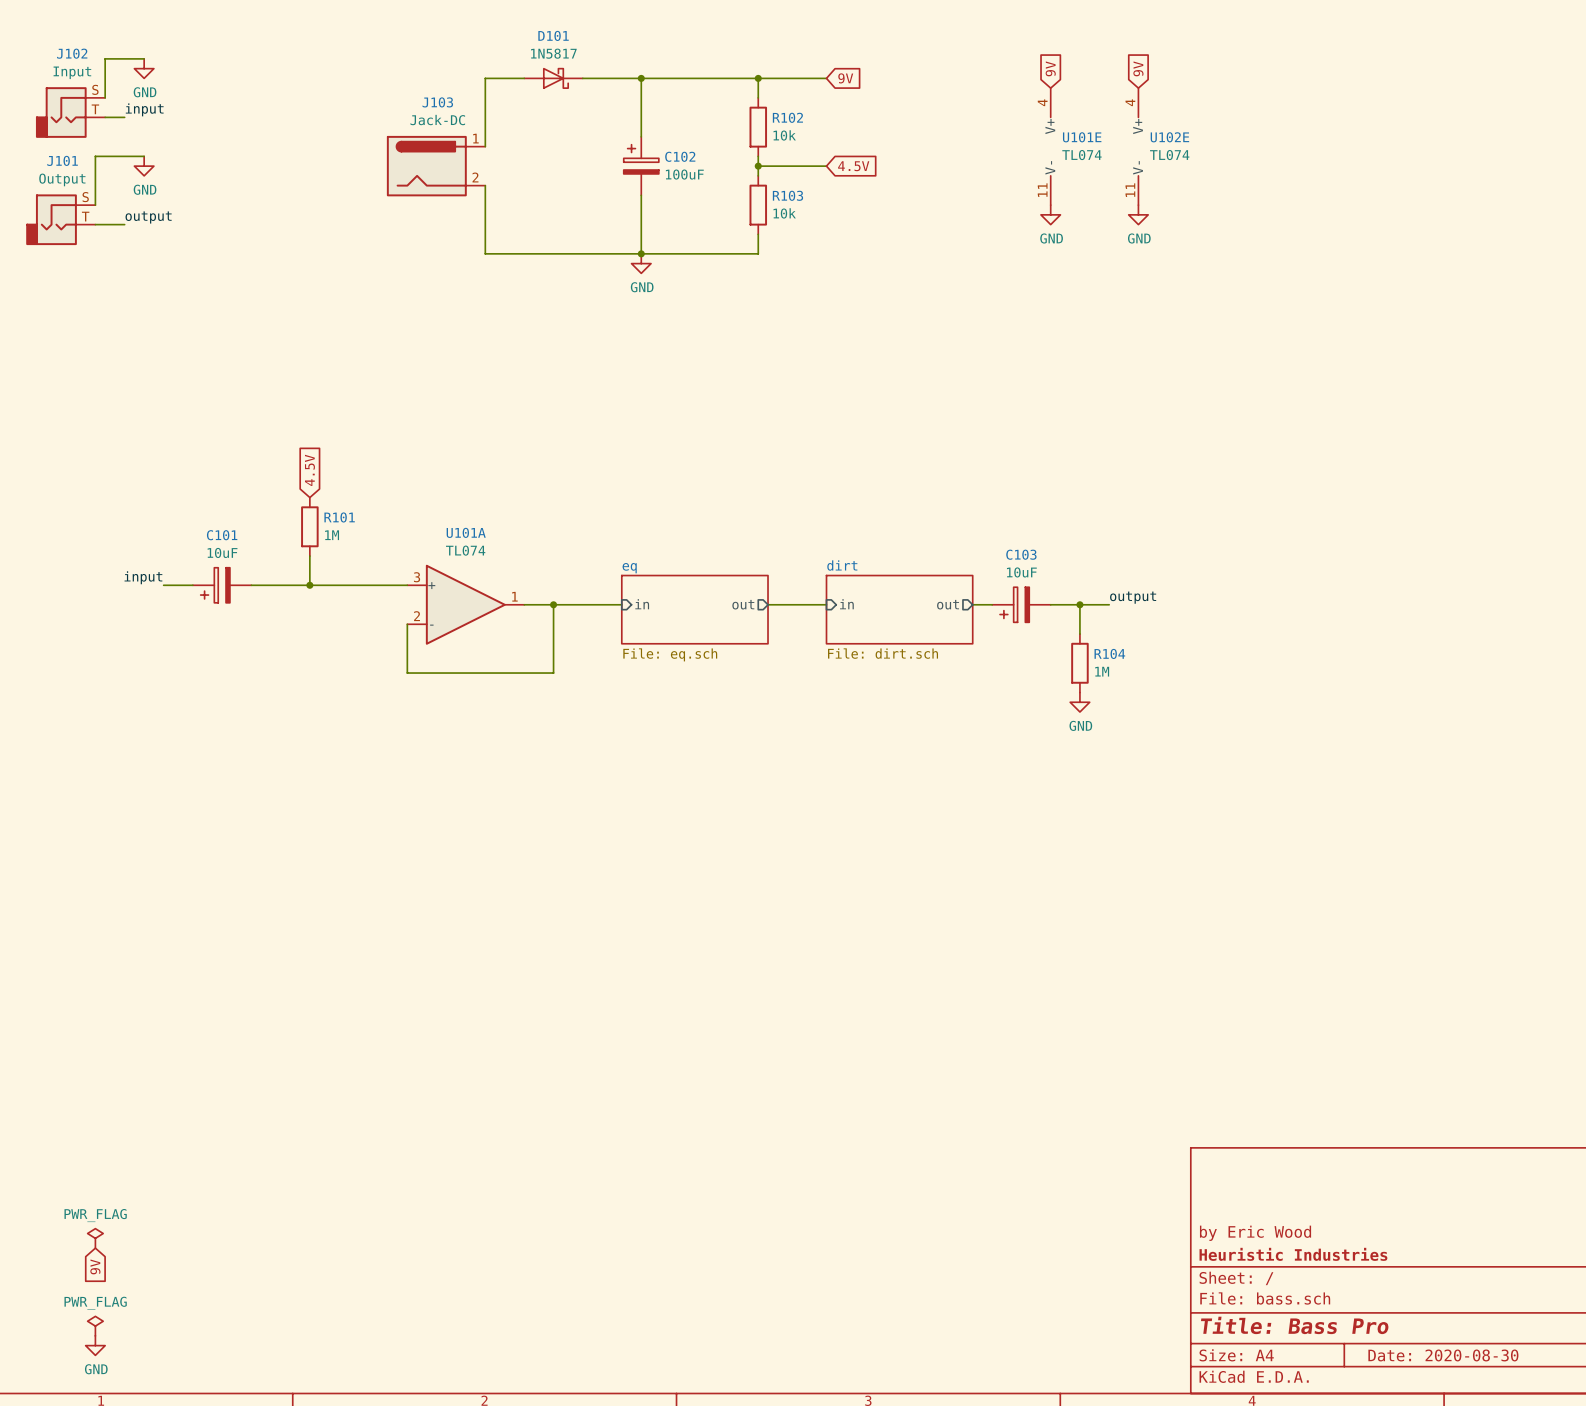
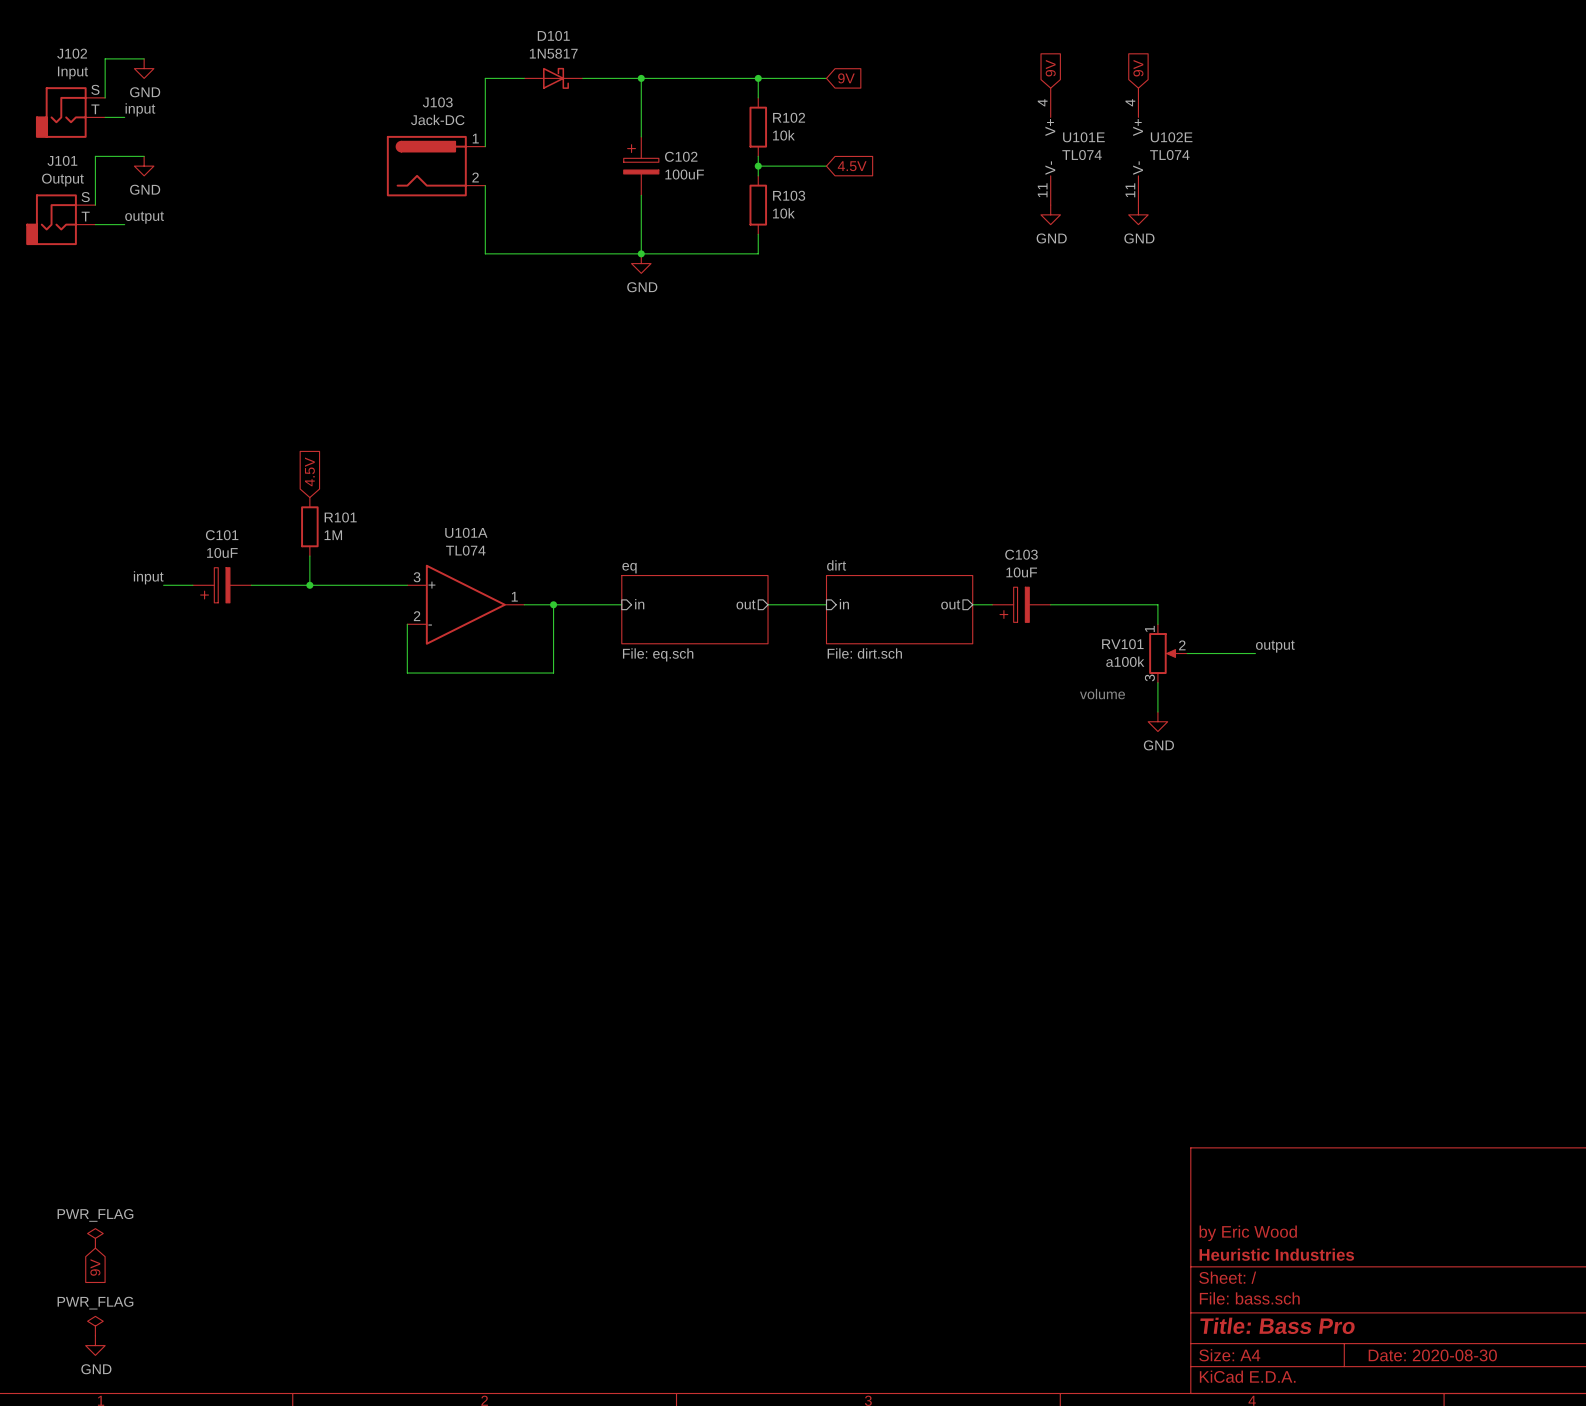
label position: output (1133, 597) -> output (1275, 646)
wire: (1079, 604) (1079, 634) -> (1157, 682) (1157, 712)
junction: (1079, 604) -> none
wire: none -> (1109, 604) (1157, 604) (1157, 624)
RV101: none -> a100k (1168, 653)
wire: none -> (1187, 653) (1255, 653)
R104: 1M (1079, 663) -> none
text: none -> volume (1102, 694)
power symbol position: GND (1079, 702) -> GND (1157, 721)

